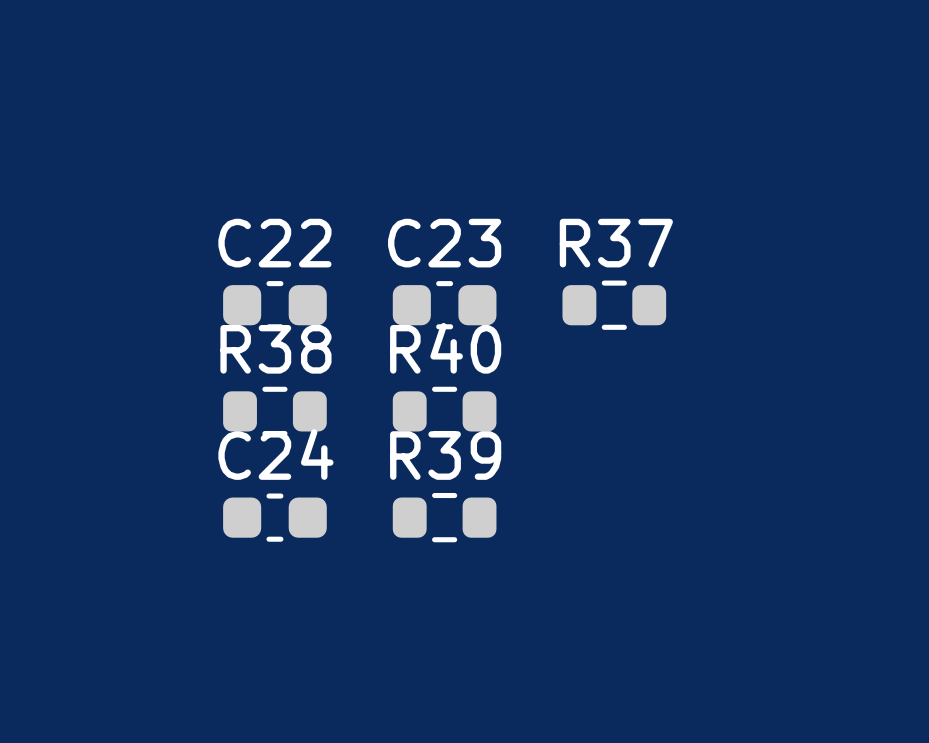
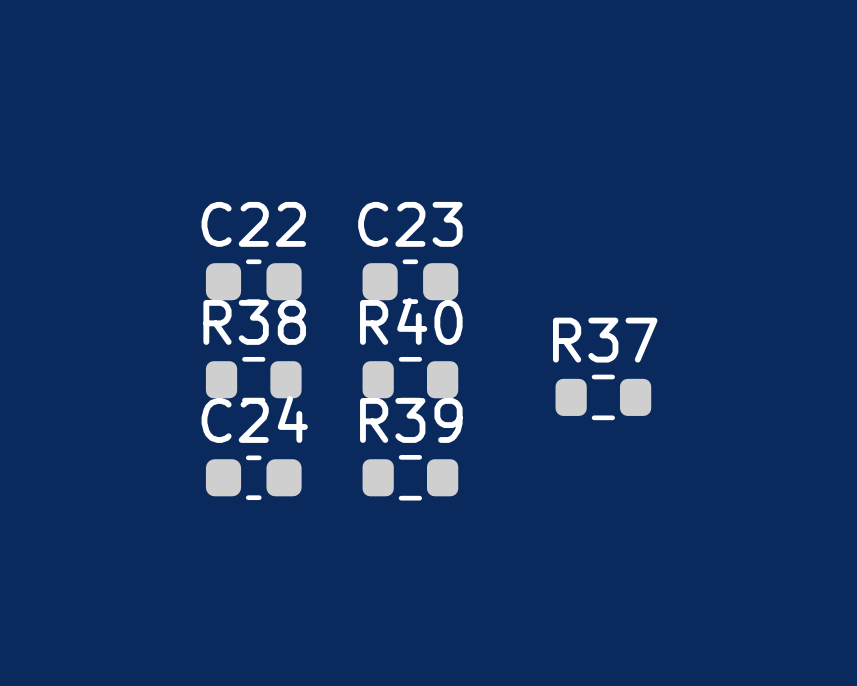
R37 position: (614, 305) -> (603, 397)

